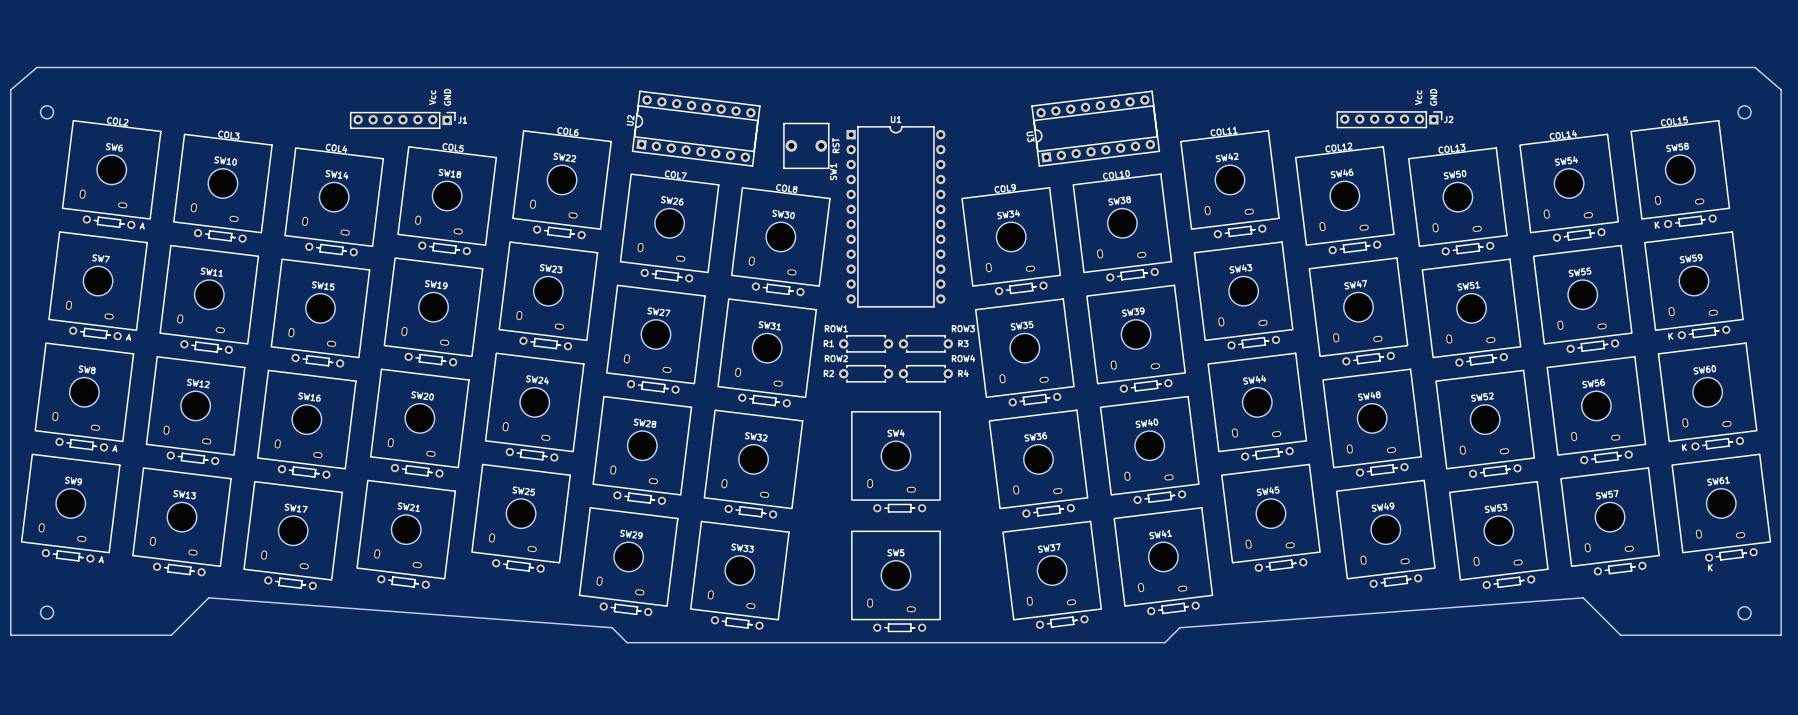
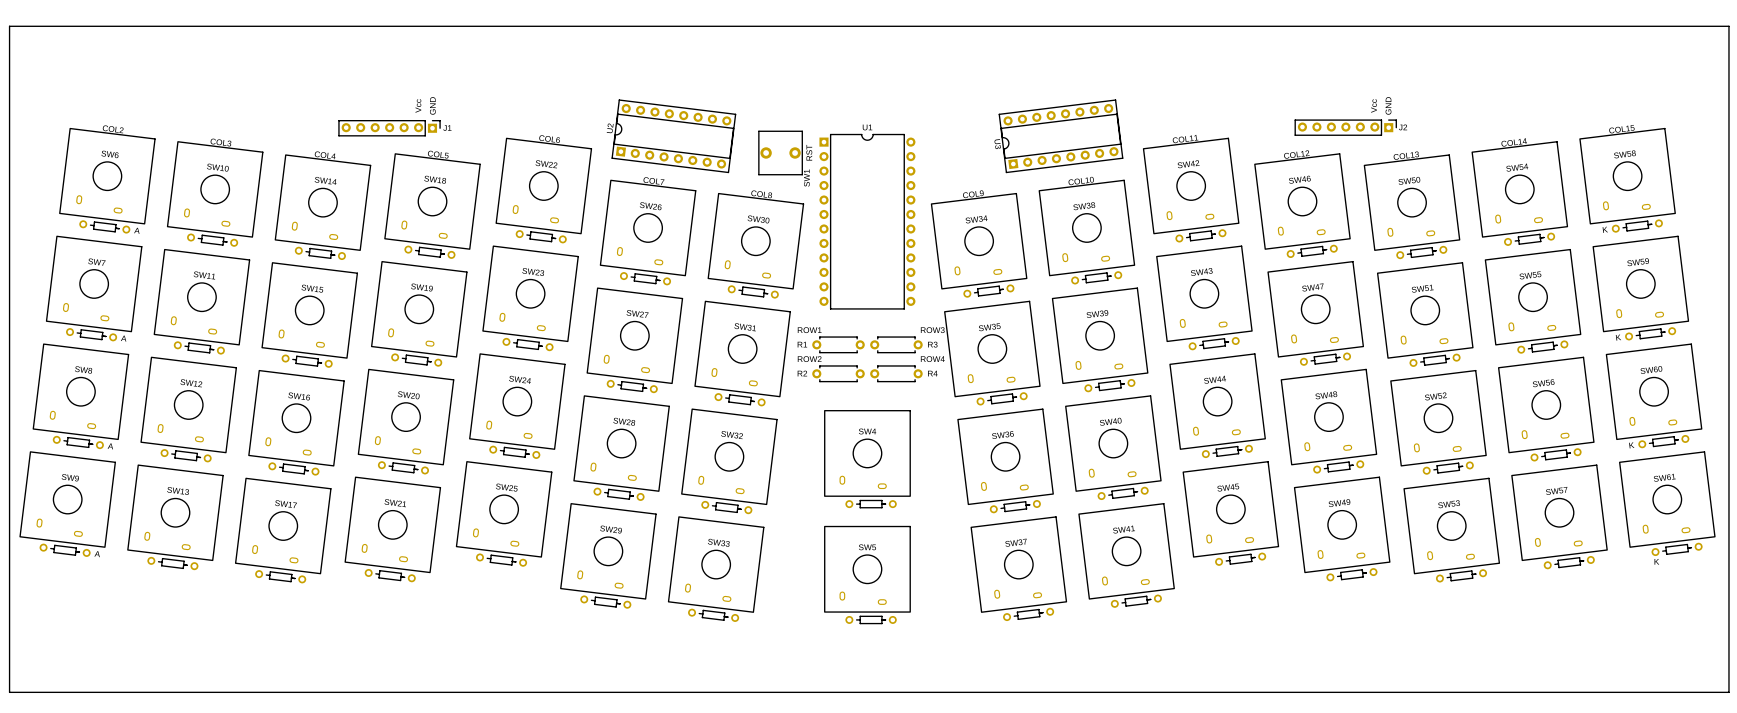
board edge: (10, 89) (36, 67) (1755, 67) (1781, 89) (1781, 635) (1620, 635) (1583, 597) (1179, 627) (1164, 642) (627, 642) (612, 627) (208, 597) (171, 635) (10, 635) -> (9, 98) (9, 26) (1728, 26) (1728, 692) (9, 692) (9, 627)
round board edge: [40, 105, 54, 120] -> none
round board edge: [1737, 105, 1752, 120] -> none
round board edge: [40, 605, 54, 620] -> none
round board edge: [1737, 606, 1752, 620] -> none

